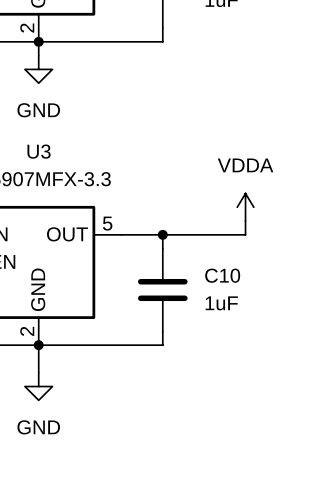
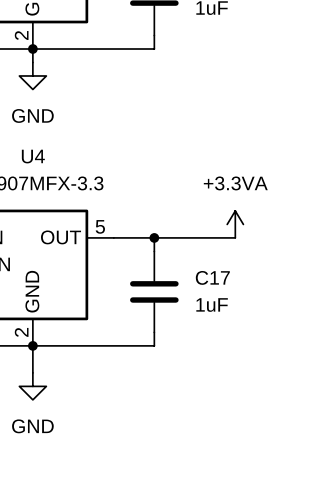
U3 name: U3 (39, 151) -> U4 (33, 156)
power symbol: VDDA (245, 207) -> none
power symbol: none -> +3.3VA (235, 224)
C10 name: C10 (222, 275) -> C17 (212, 277)

